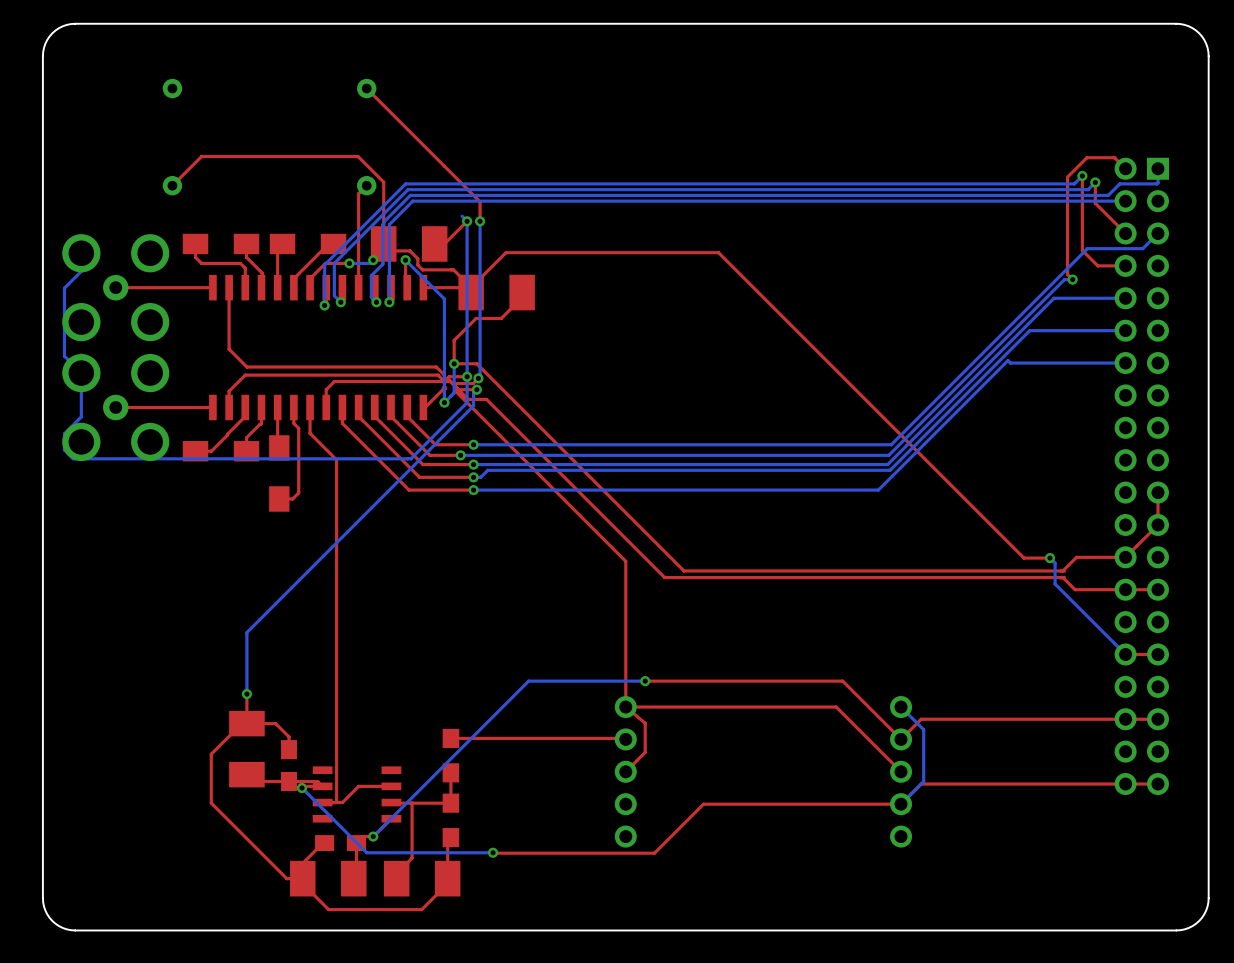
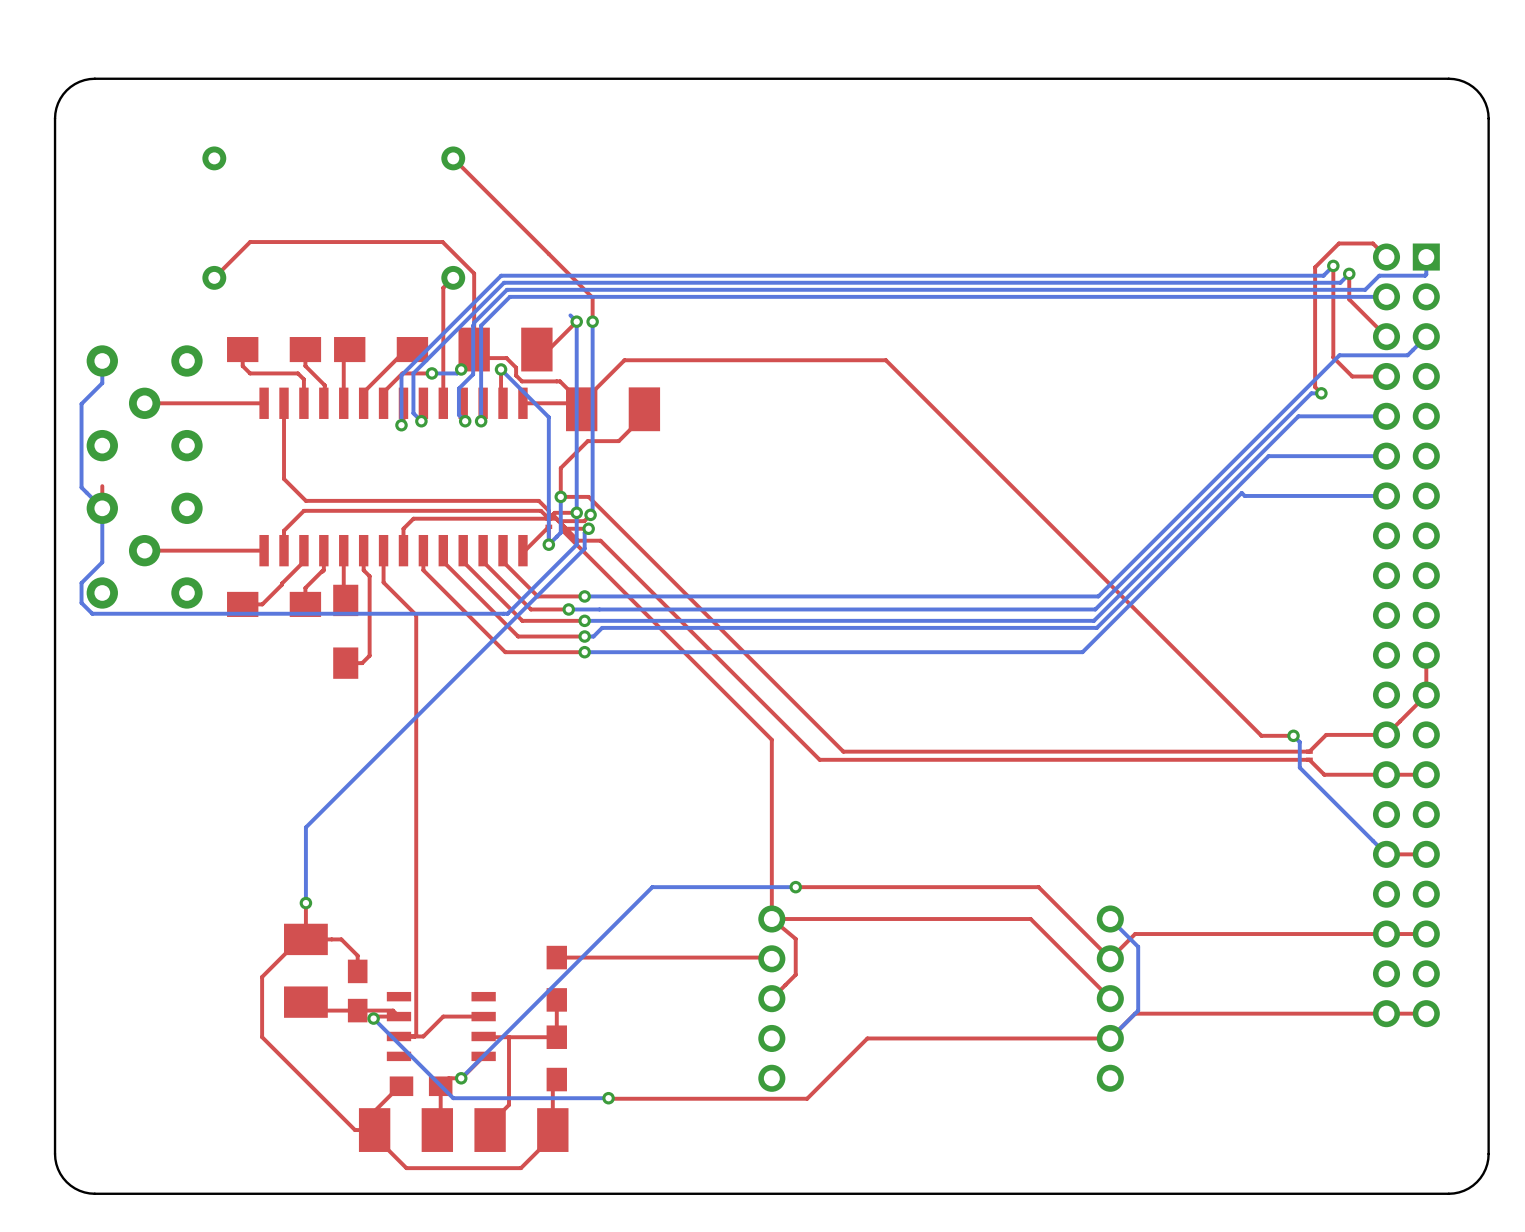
part footprint: [62, 234, 170, 342] -> [86, 345, 203, 462]
part footprint: [62, 353, 170, 462] -> [86, 492, 203, 609]

